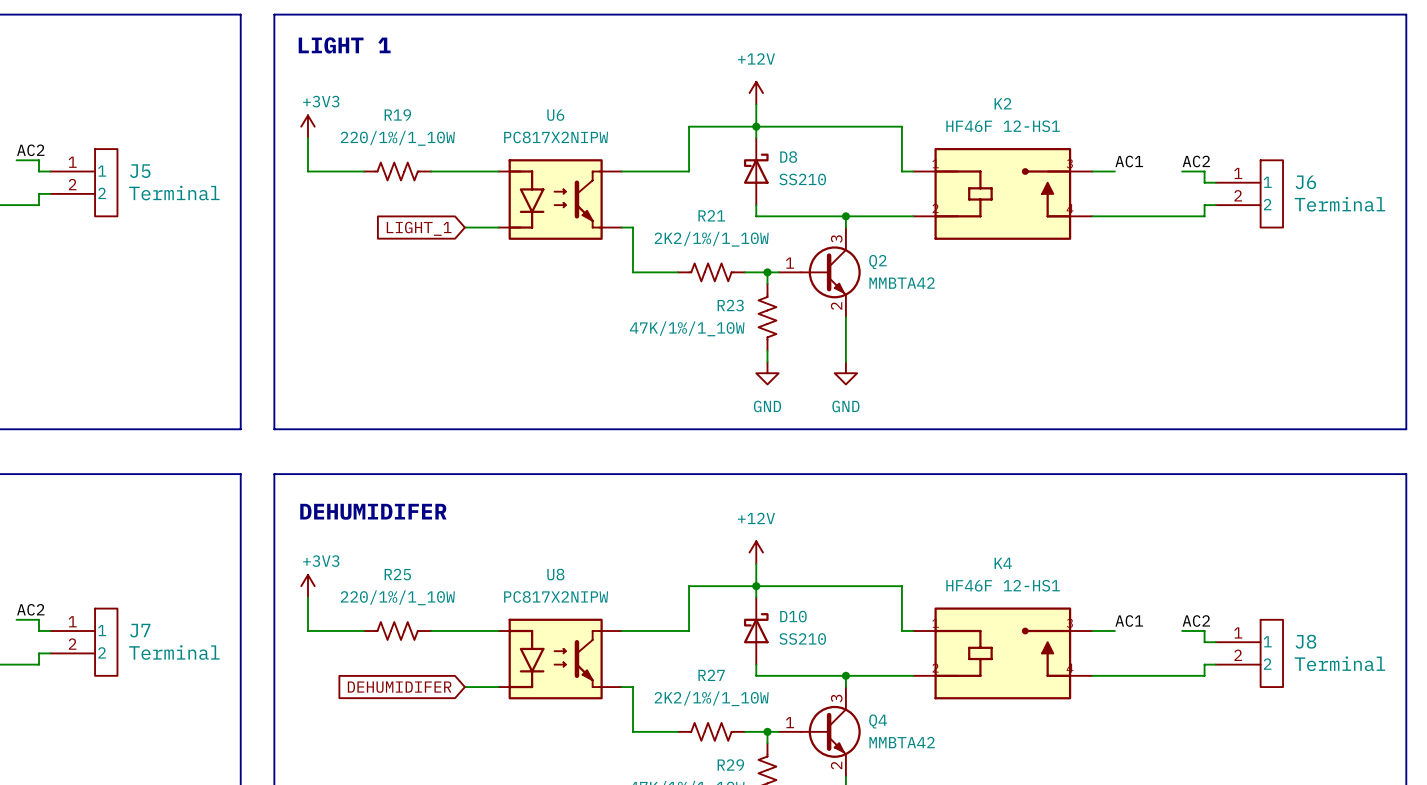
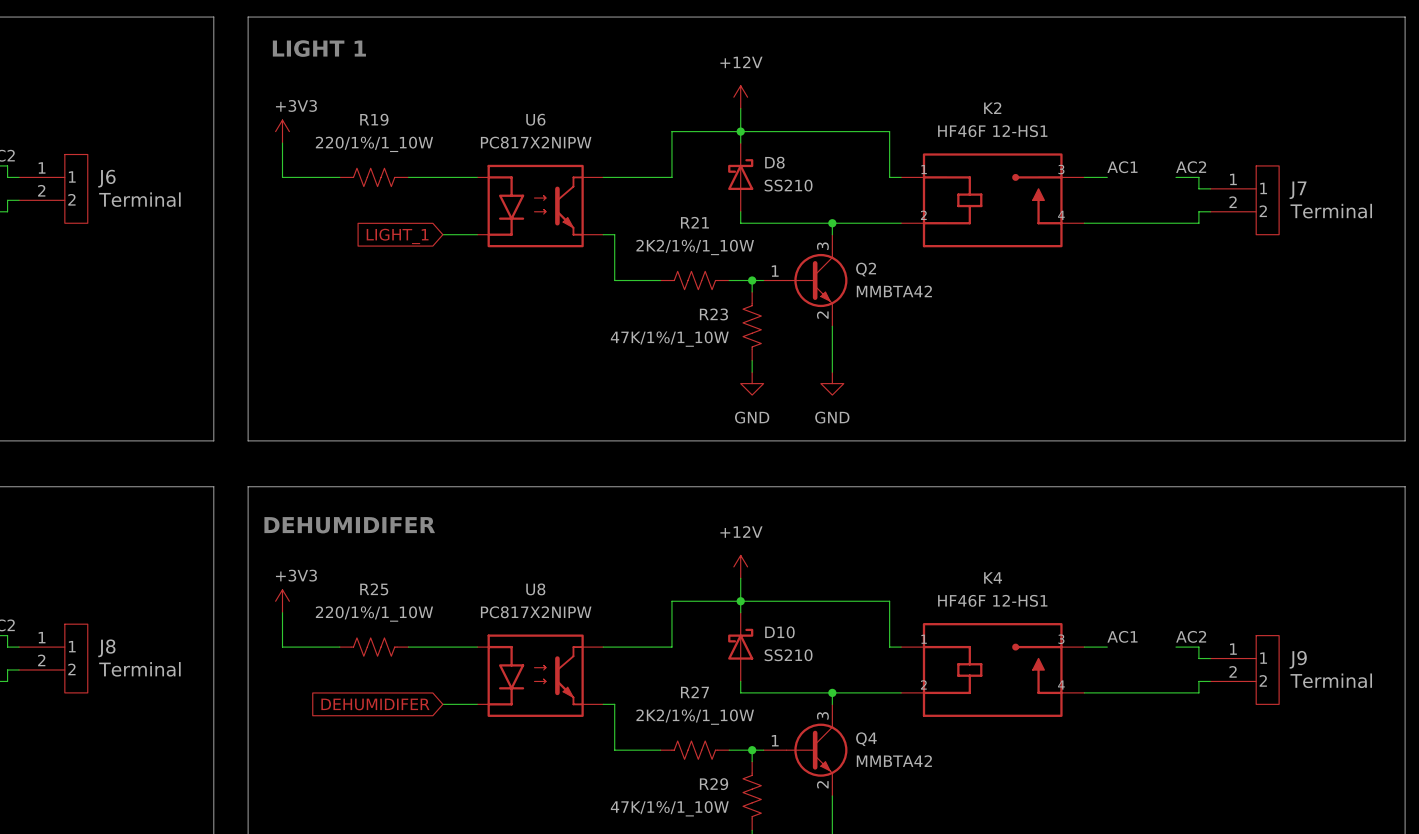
J5 name: J5 (140, 171) -> J6 (106, 178)
J6 name: J6 (1305, 182) -> J7 (1298, 190)
J7 name: J7 (140, 630) -> J8 (106, 648)
J8 name: J8 (1305, 641) -> J9 (1298, 659)

